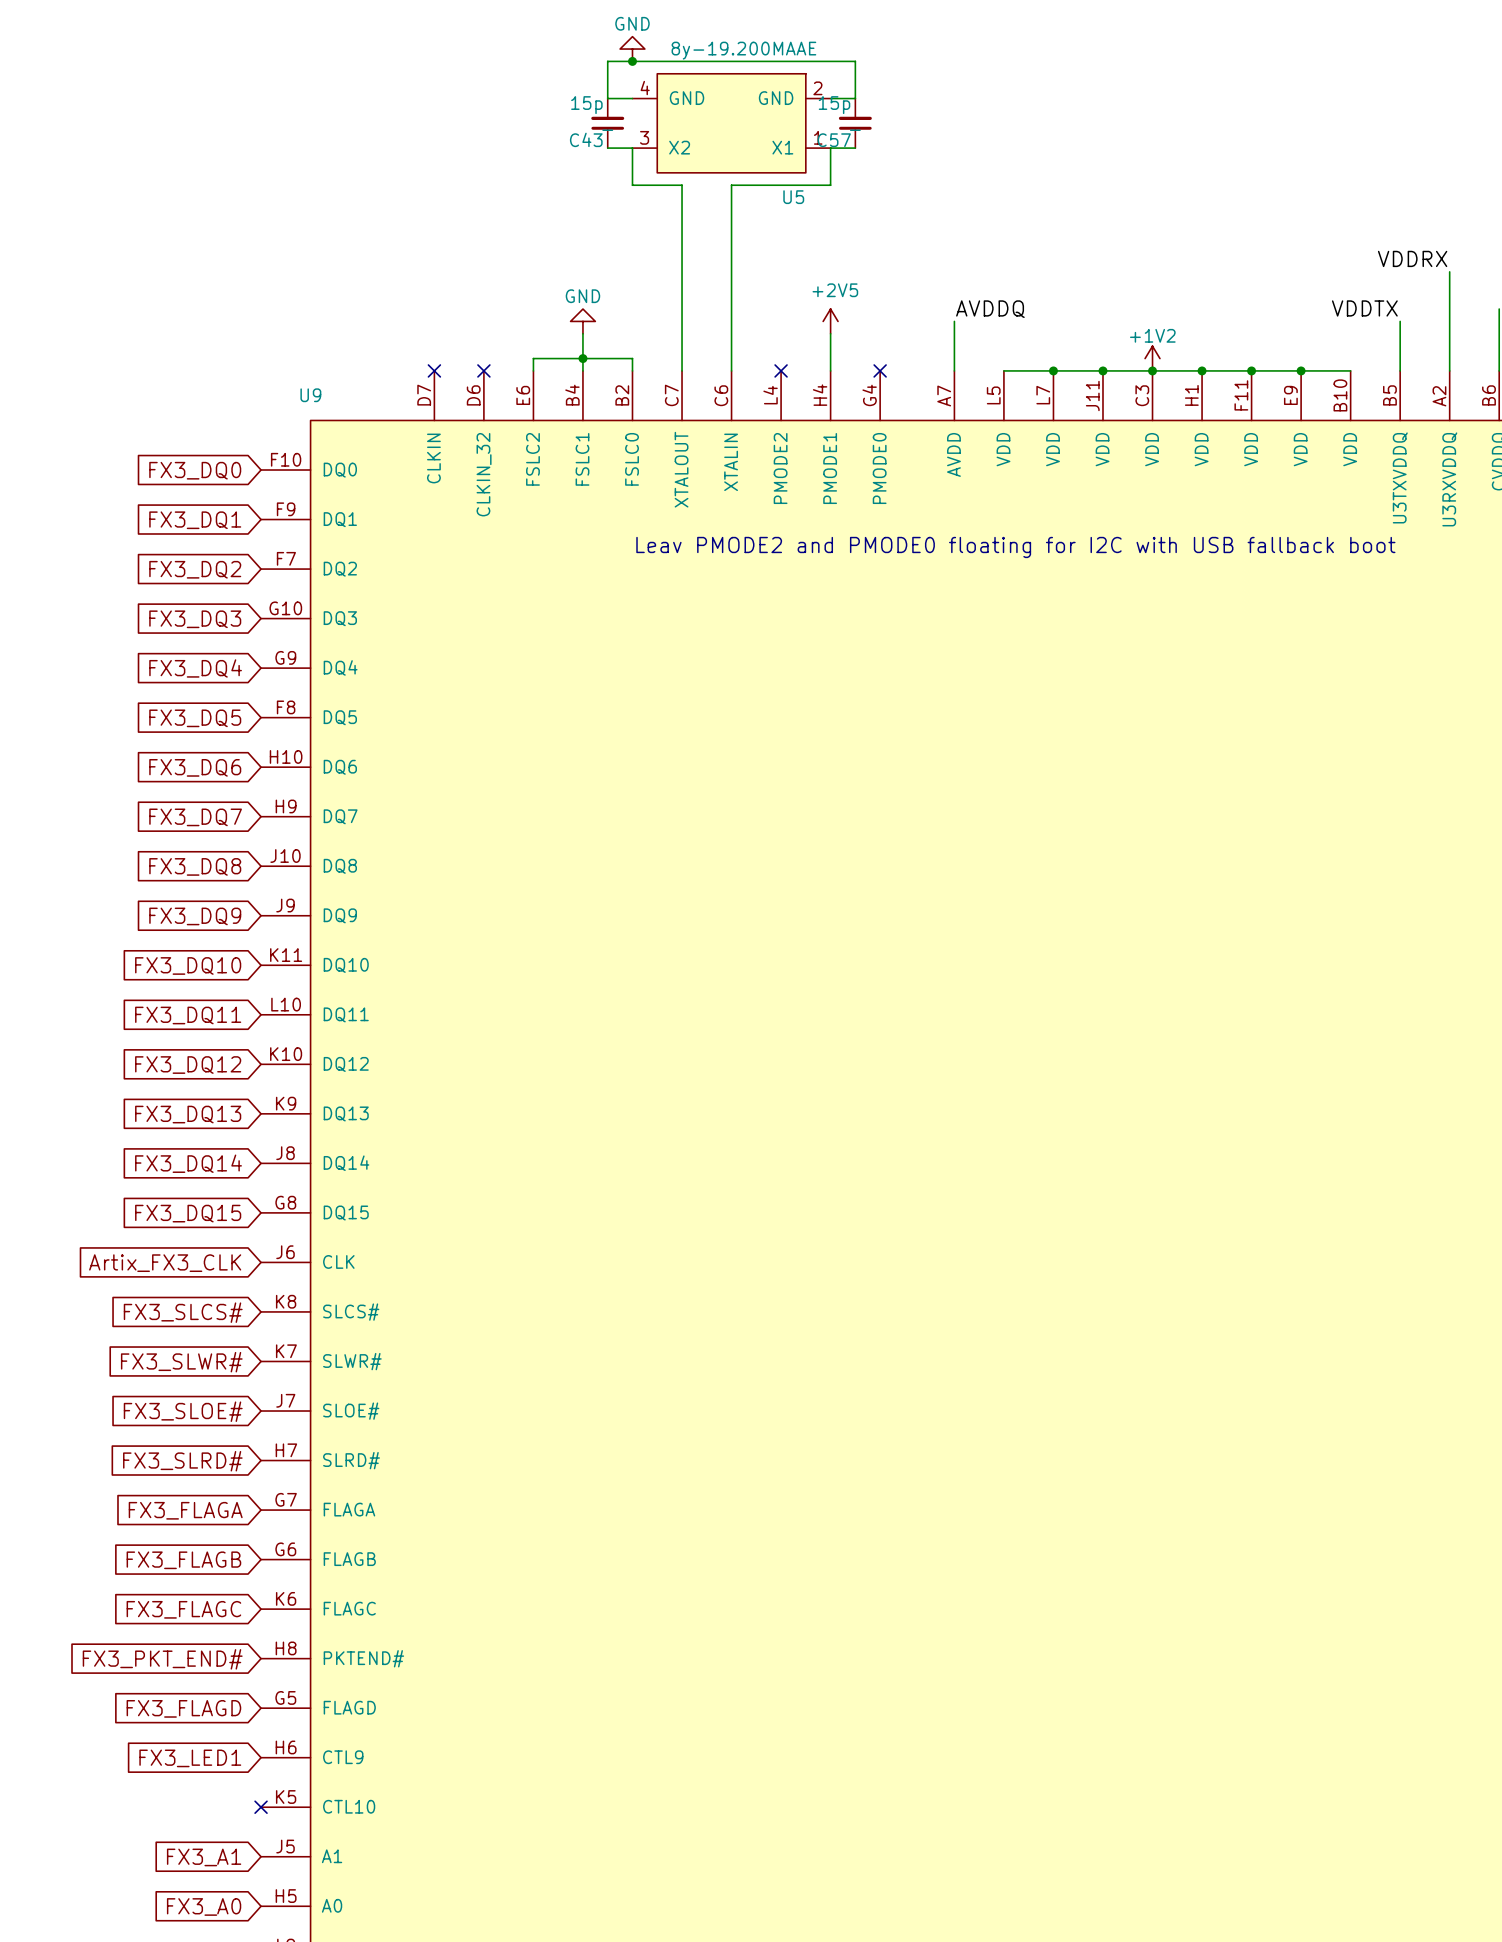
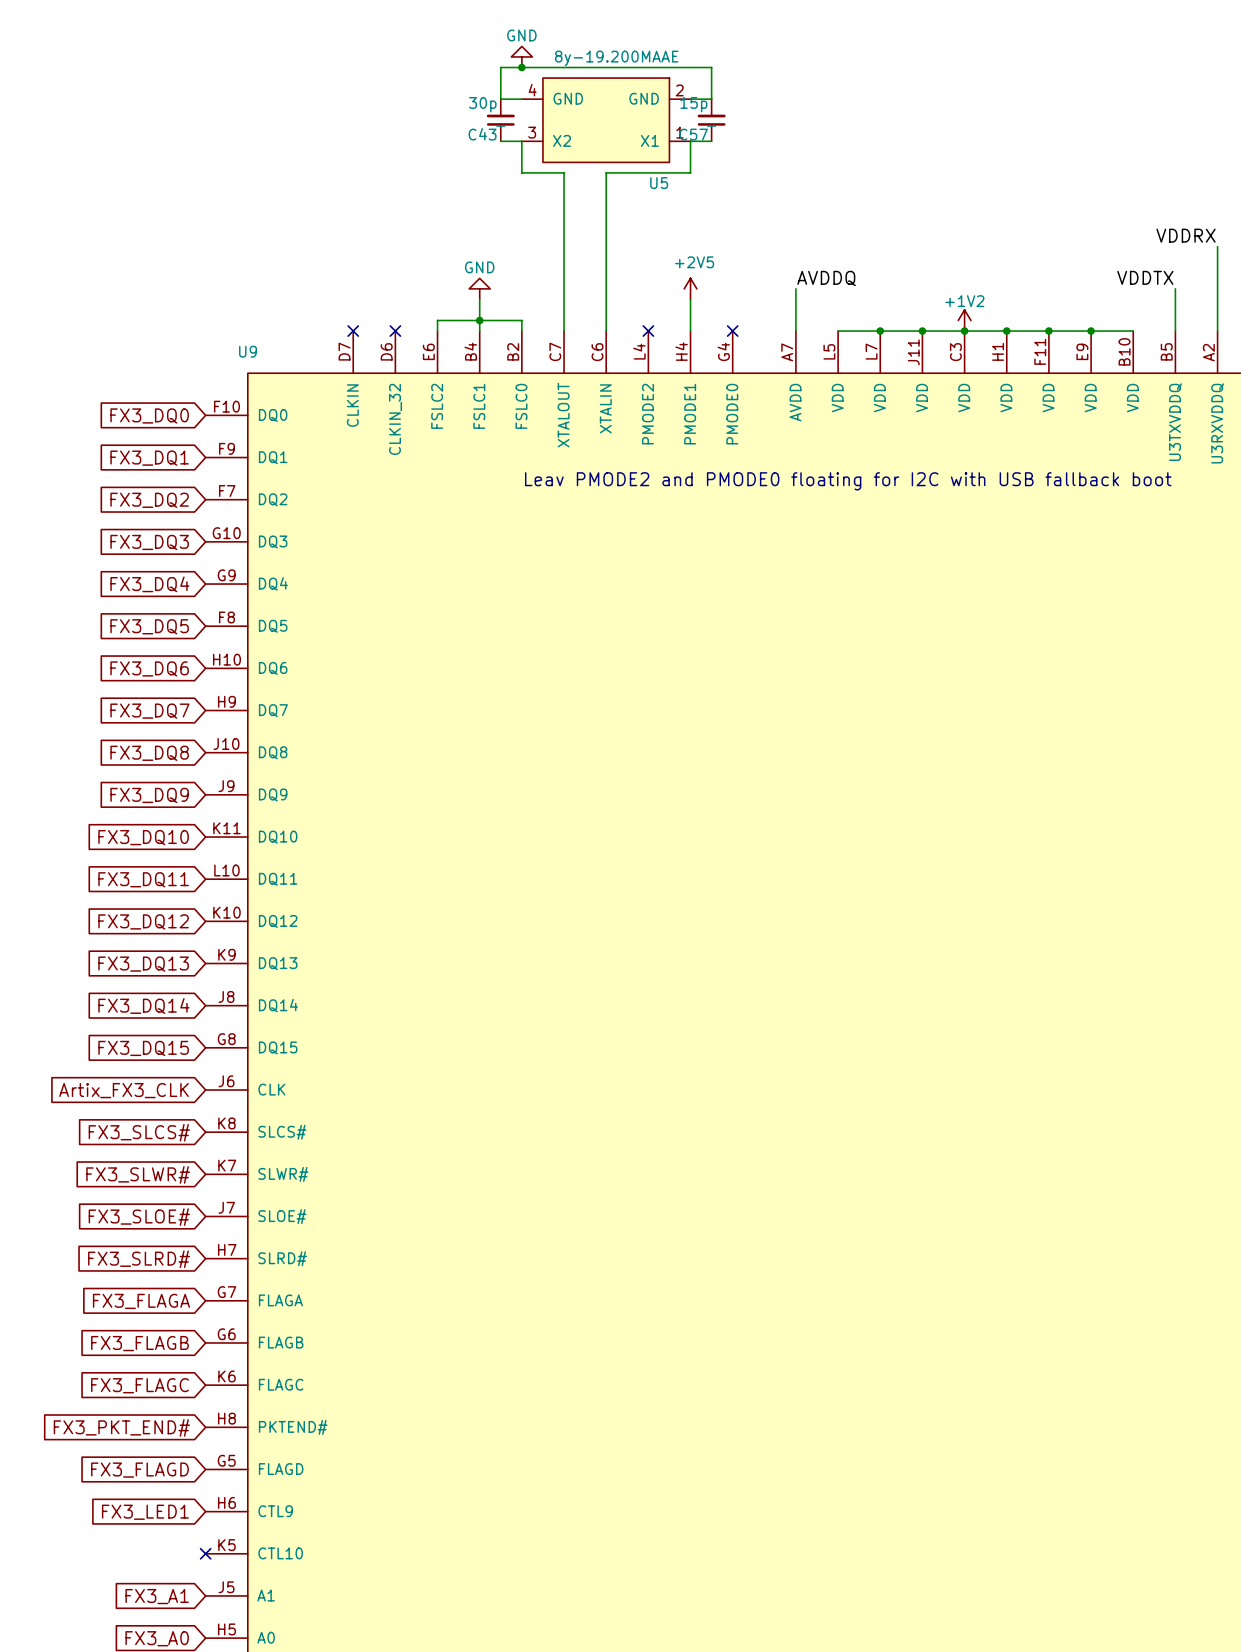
C43 value: 15p (586, 105) -> 30p (482, 104)

